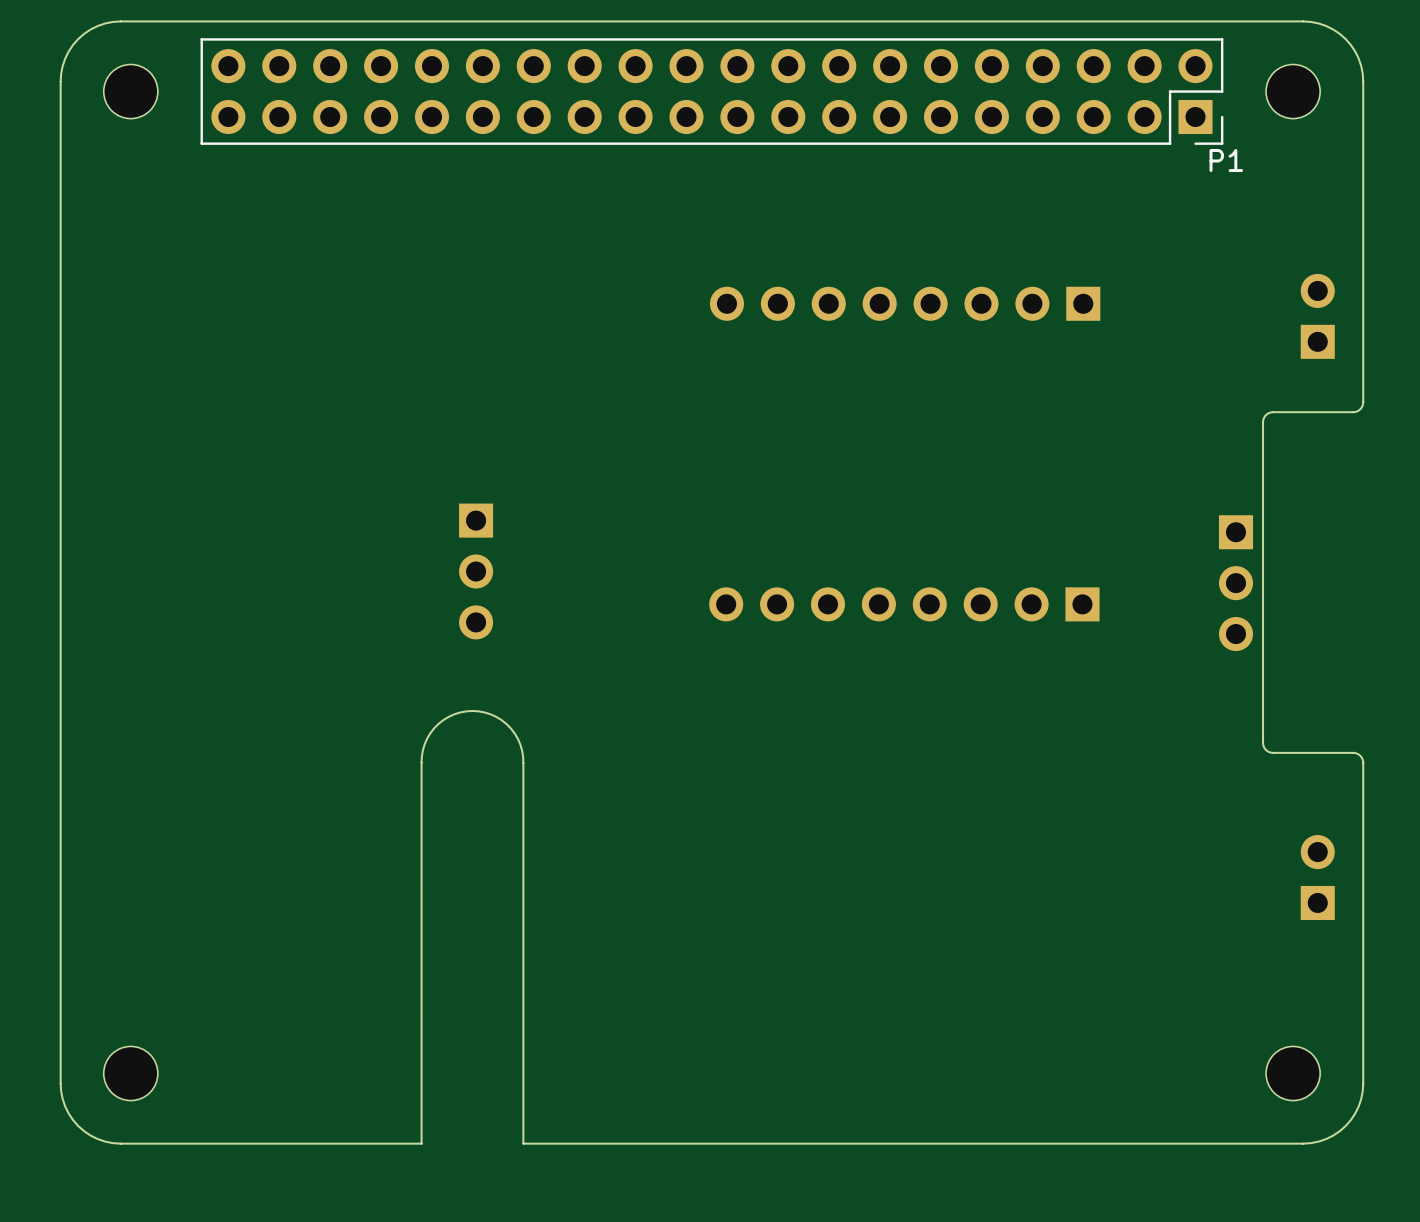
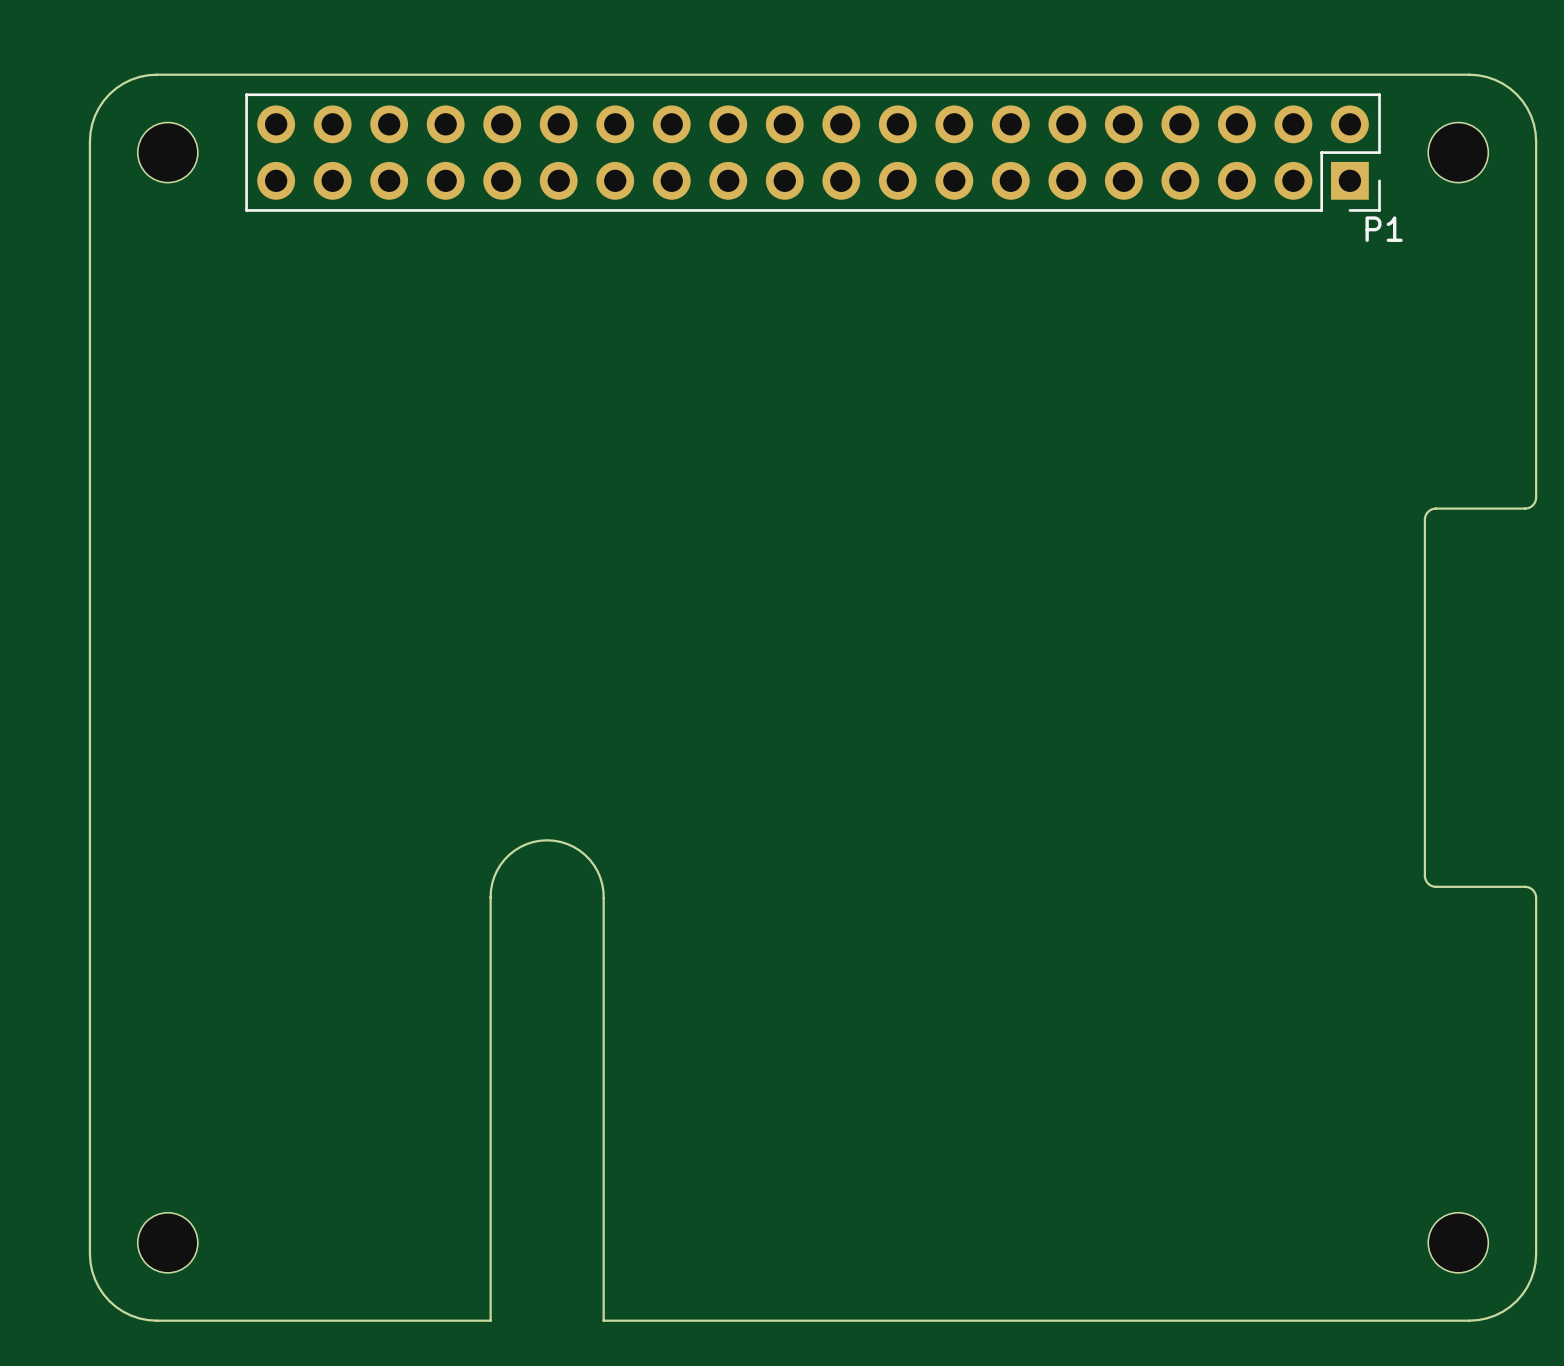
part: (905, 303) -> none
part: (1317, 316) -> none
part: (476, 571) -> none
part: (1235, 583) -> none
part: (904, 604) -> none
part: (1317, 877) -> none

